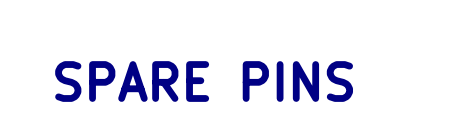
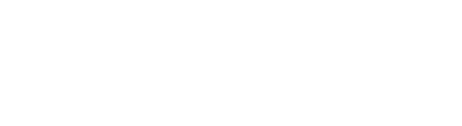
text: SPARE PINS (204, 81) -> none

